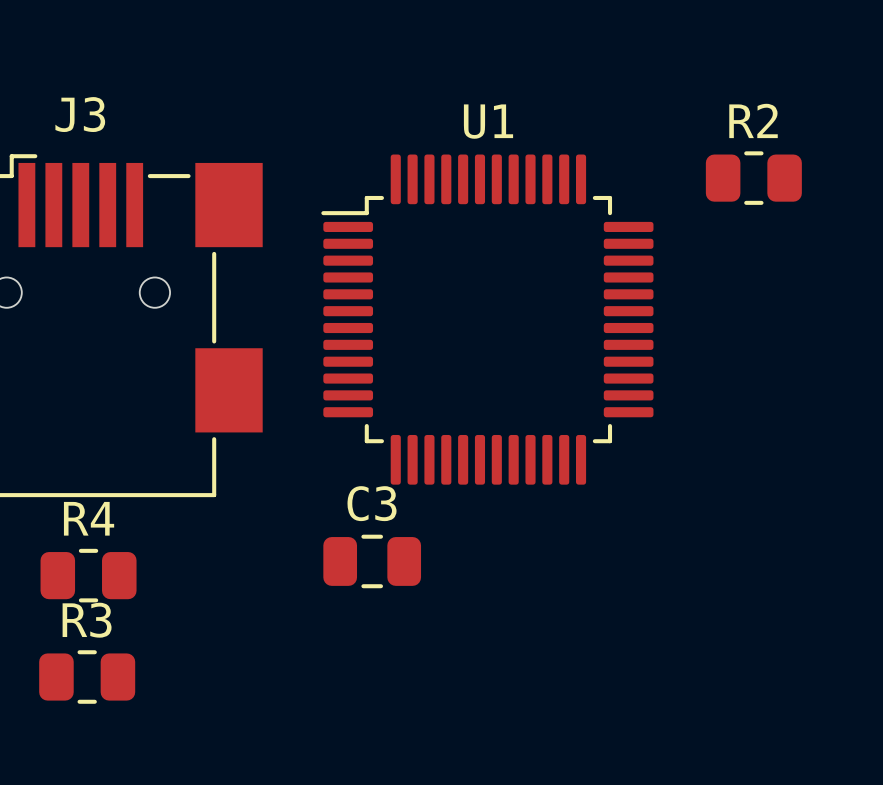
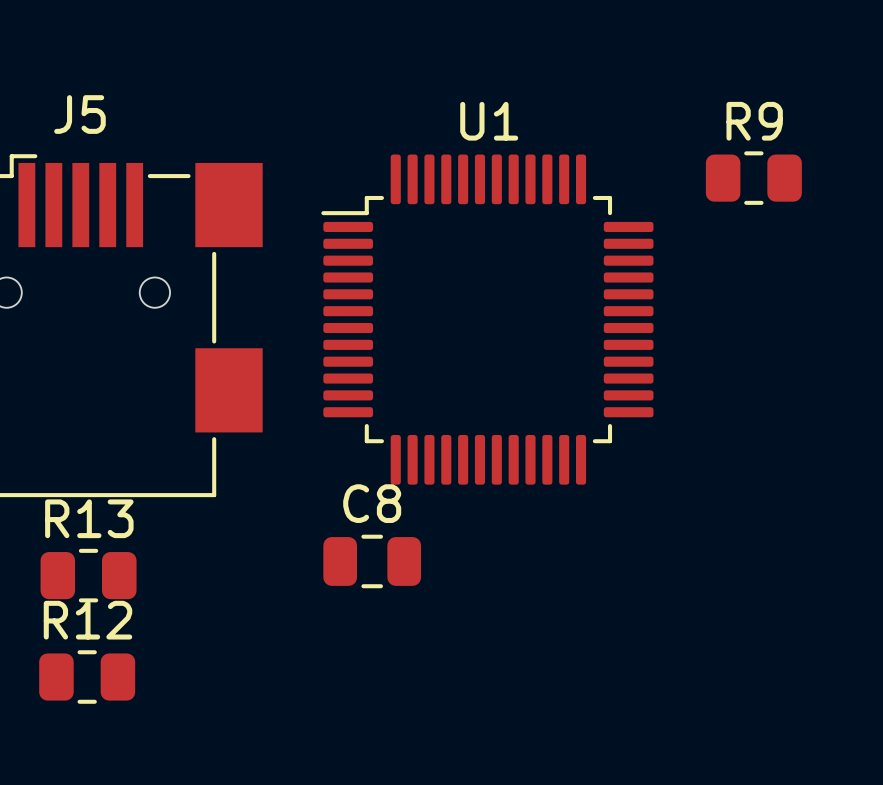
J3 name: J3 (80, 114) -> J5 (79, 114)
R2 name: R2 (753, 120) -> R9 (754, 121)
C3 name: C3 (372, 503) -> C8 (372, 503)
R4 name: R4 (89, 518) -> R13 (89, 518)
R3 name: R3 (87, 620) -> R12 (87, 620)

